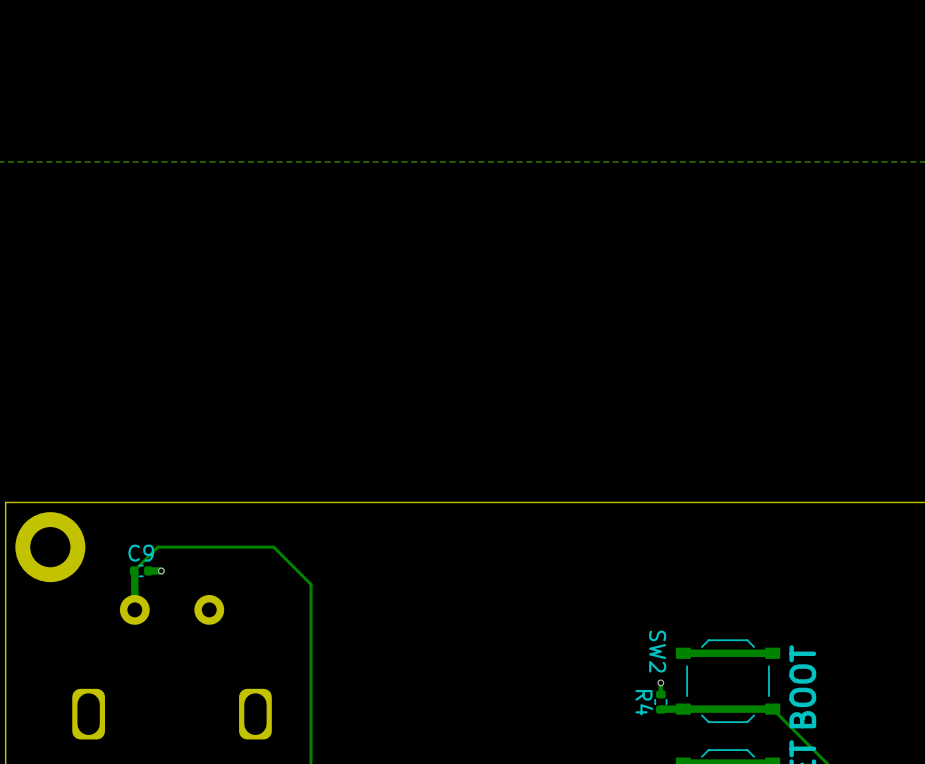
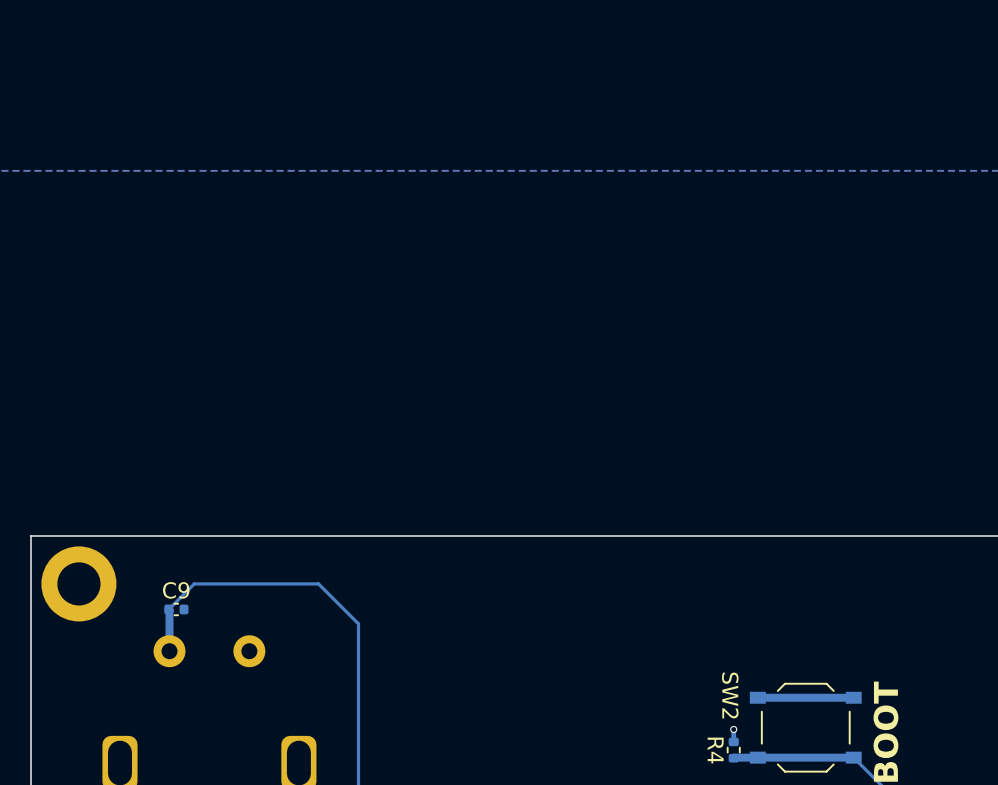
bottom track: (161, 570) (148, 570) -> none
via: (161, 570) -> none

